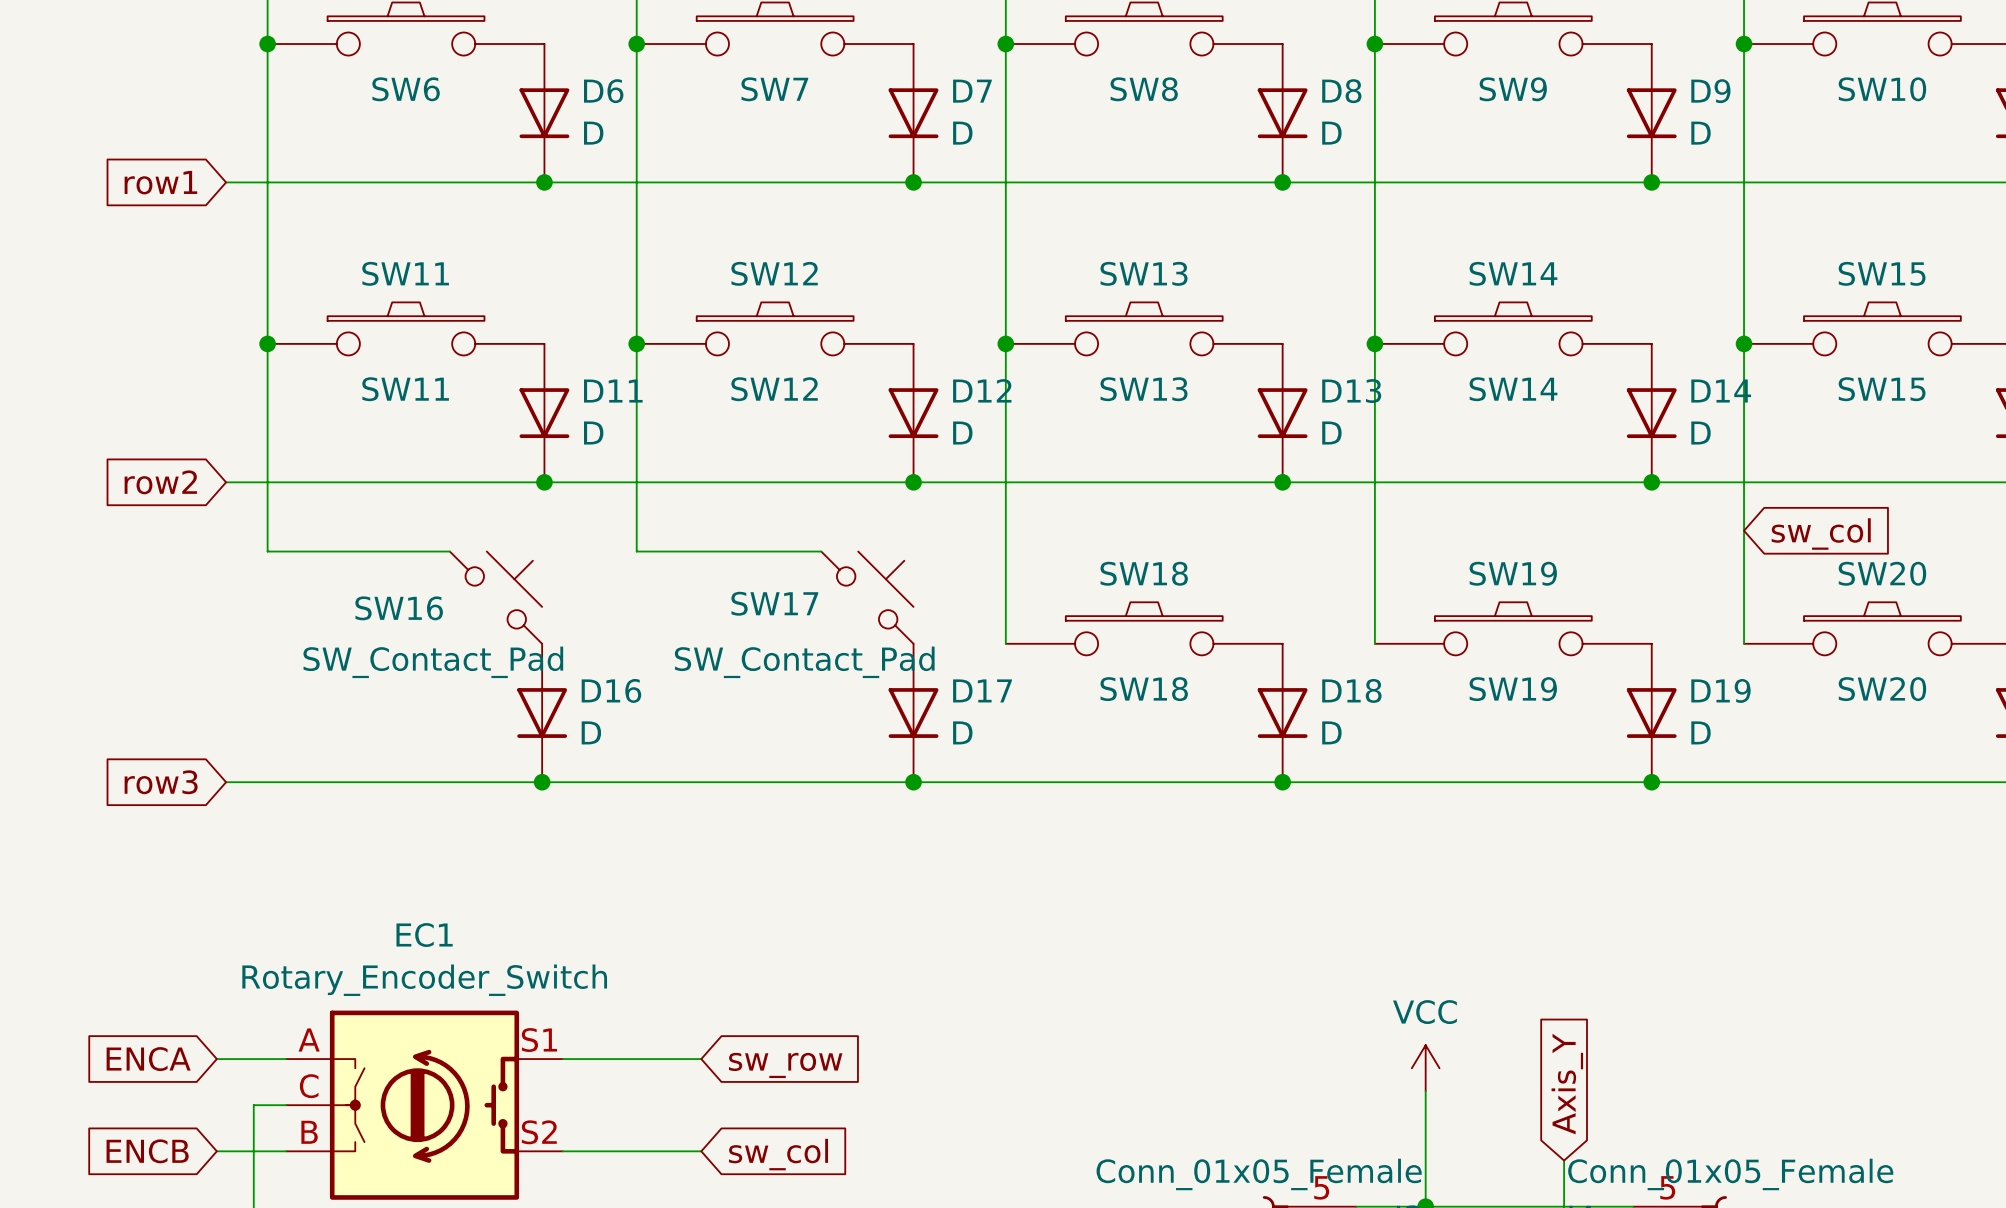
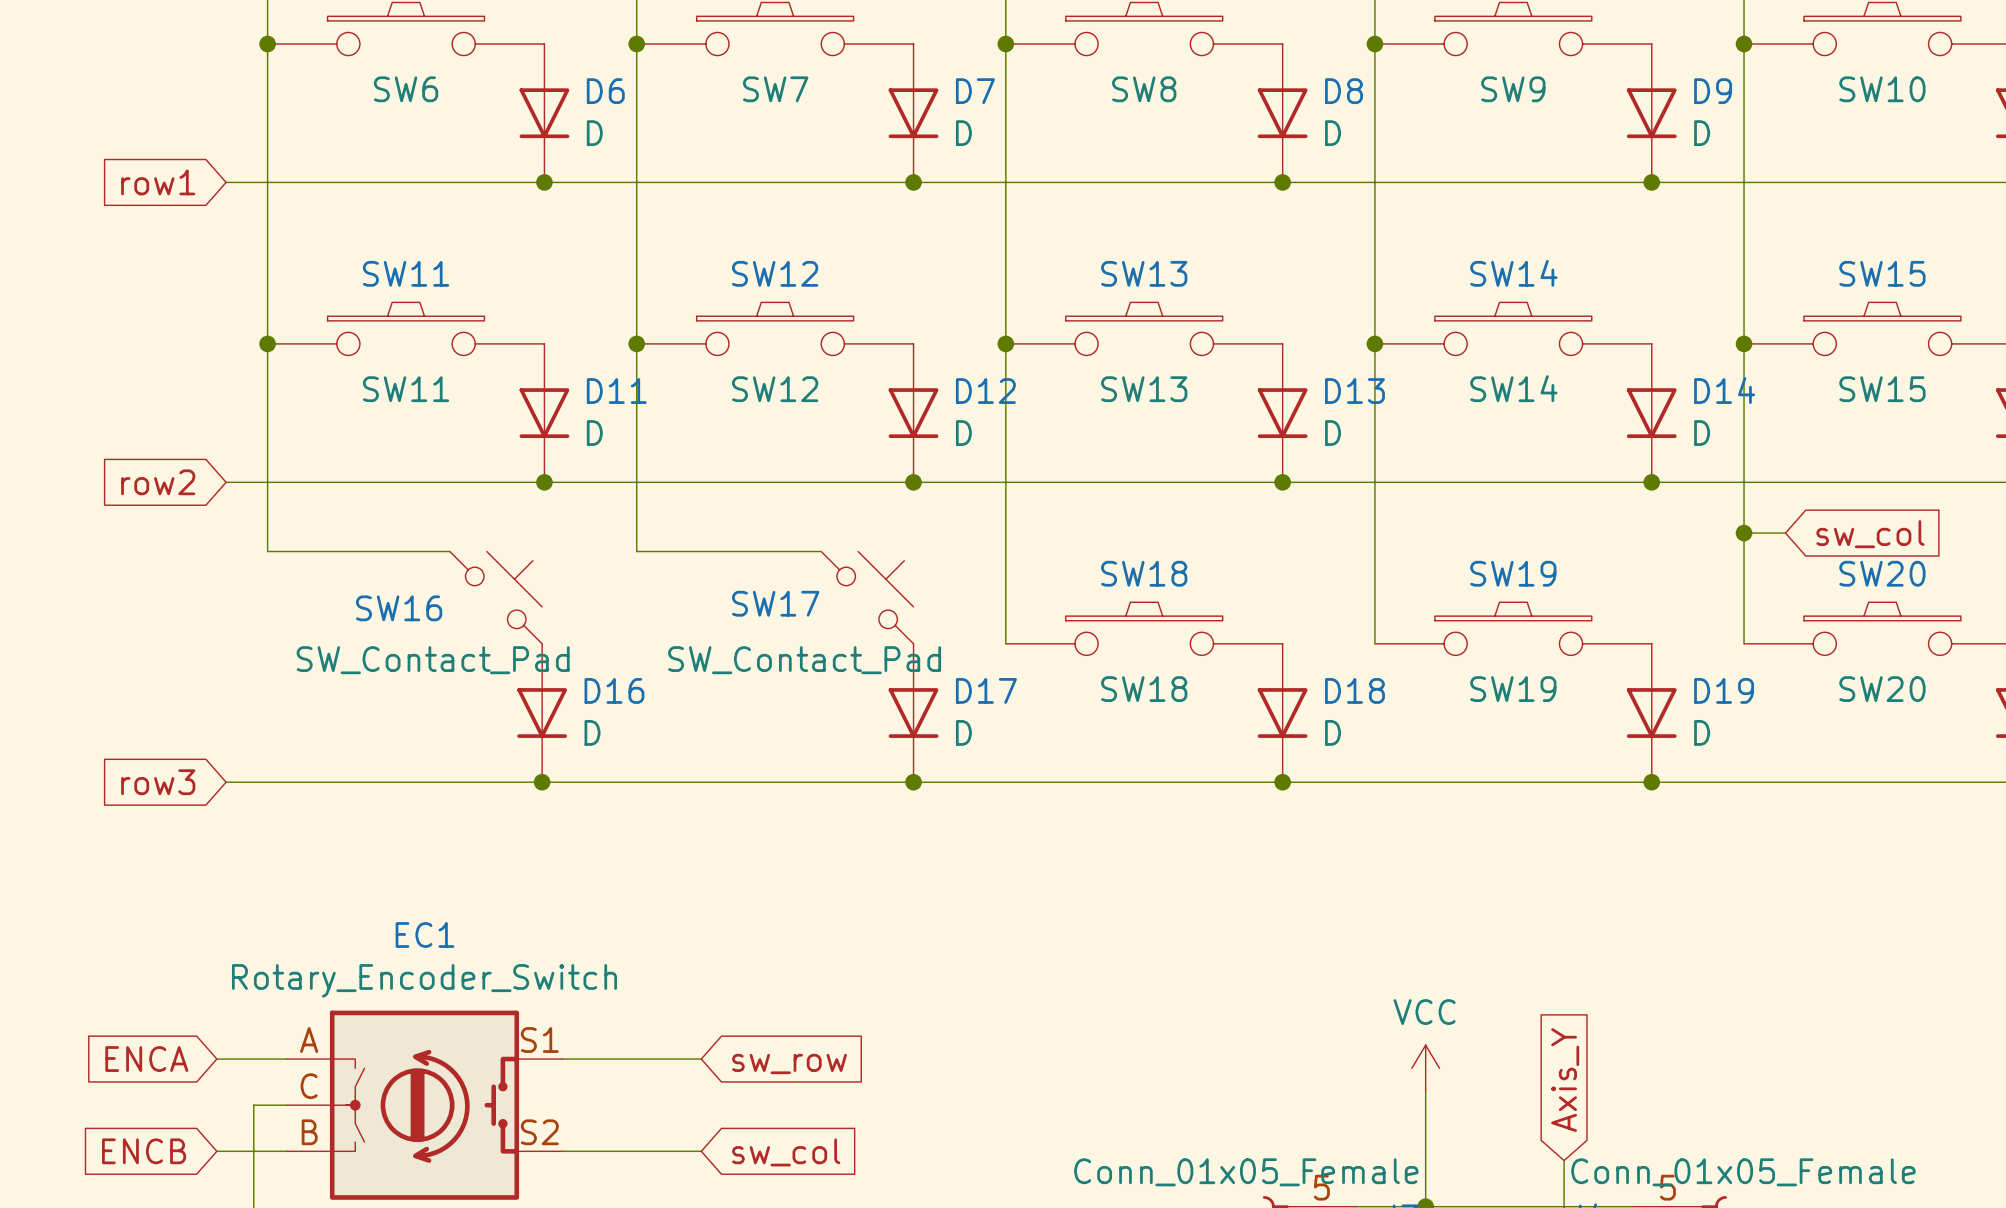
wire: none -> (1744, 533) (1785, 533)
junction: none -> (1744, 533)
global label position: sw_col (1821, 534) -> sw_col (1870, 534)

